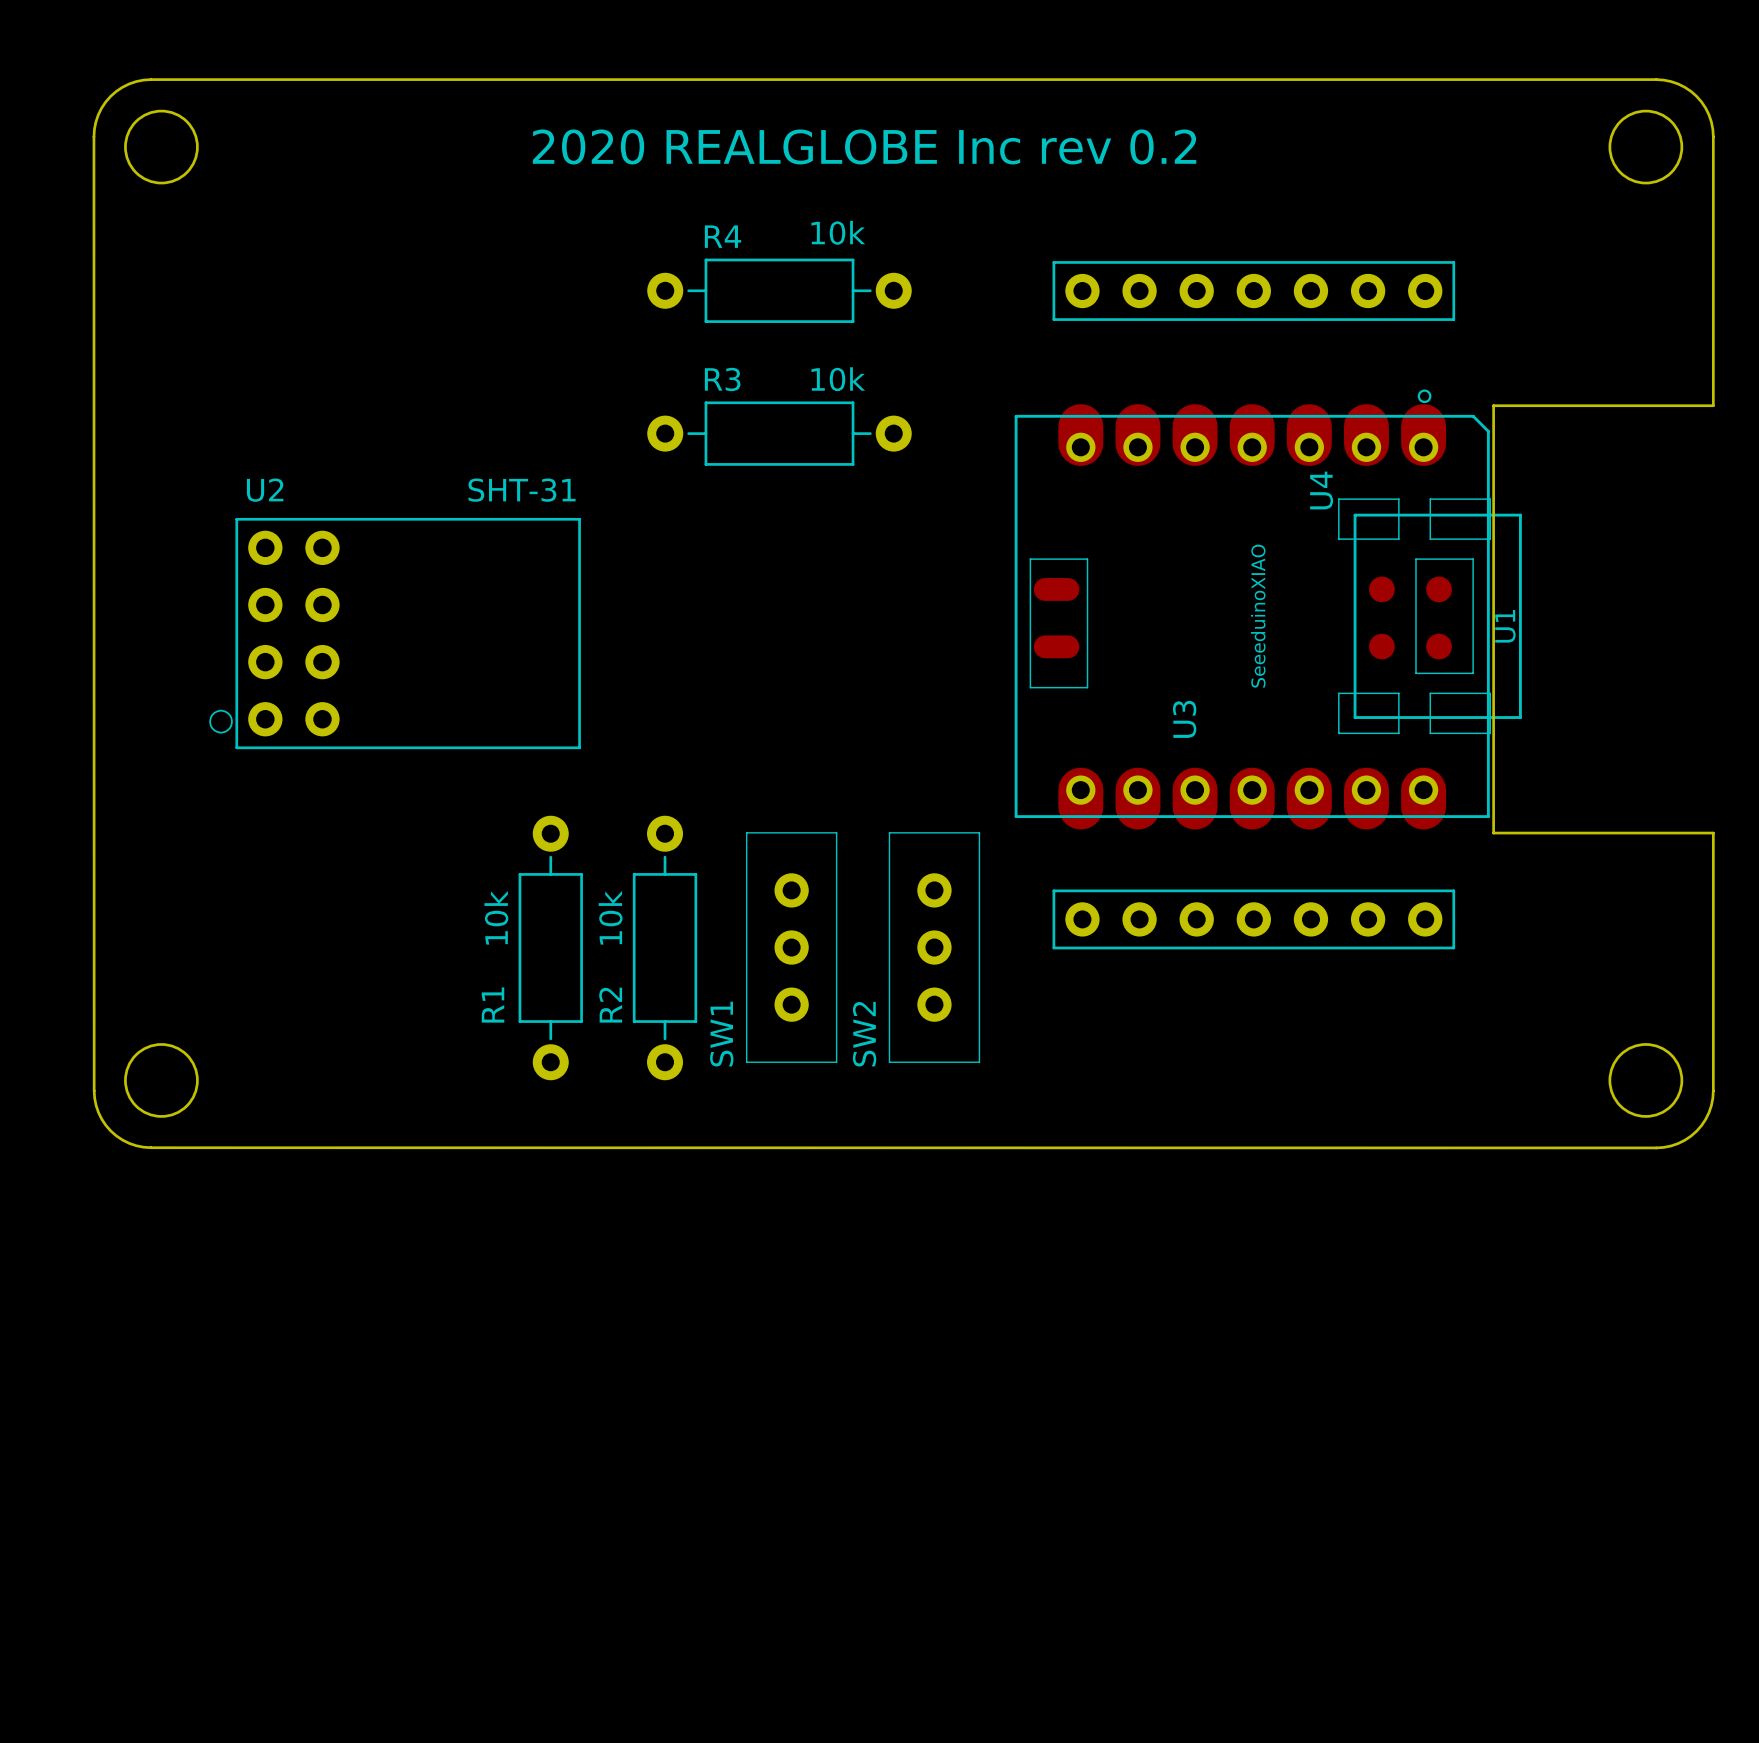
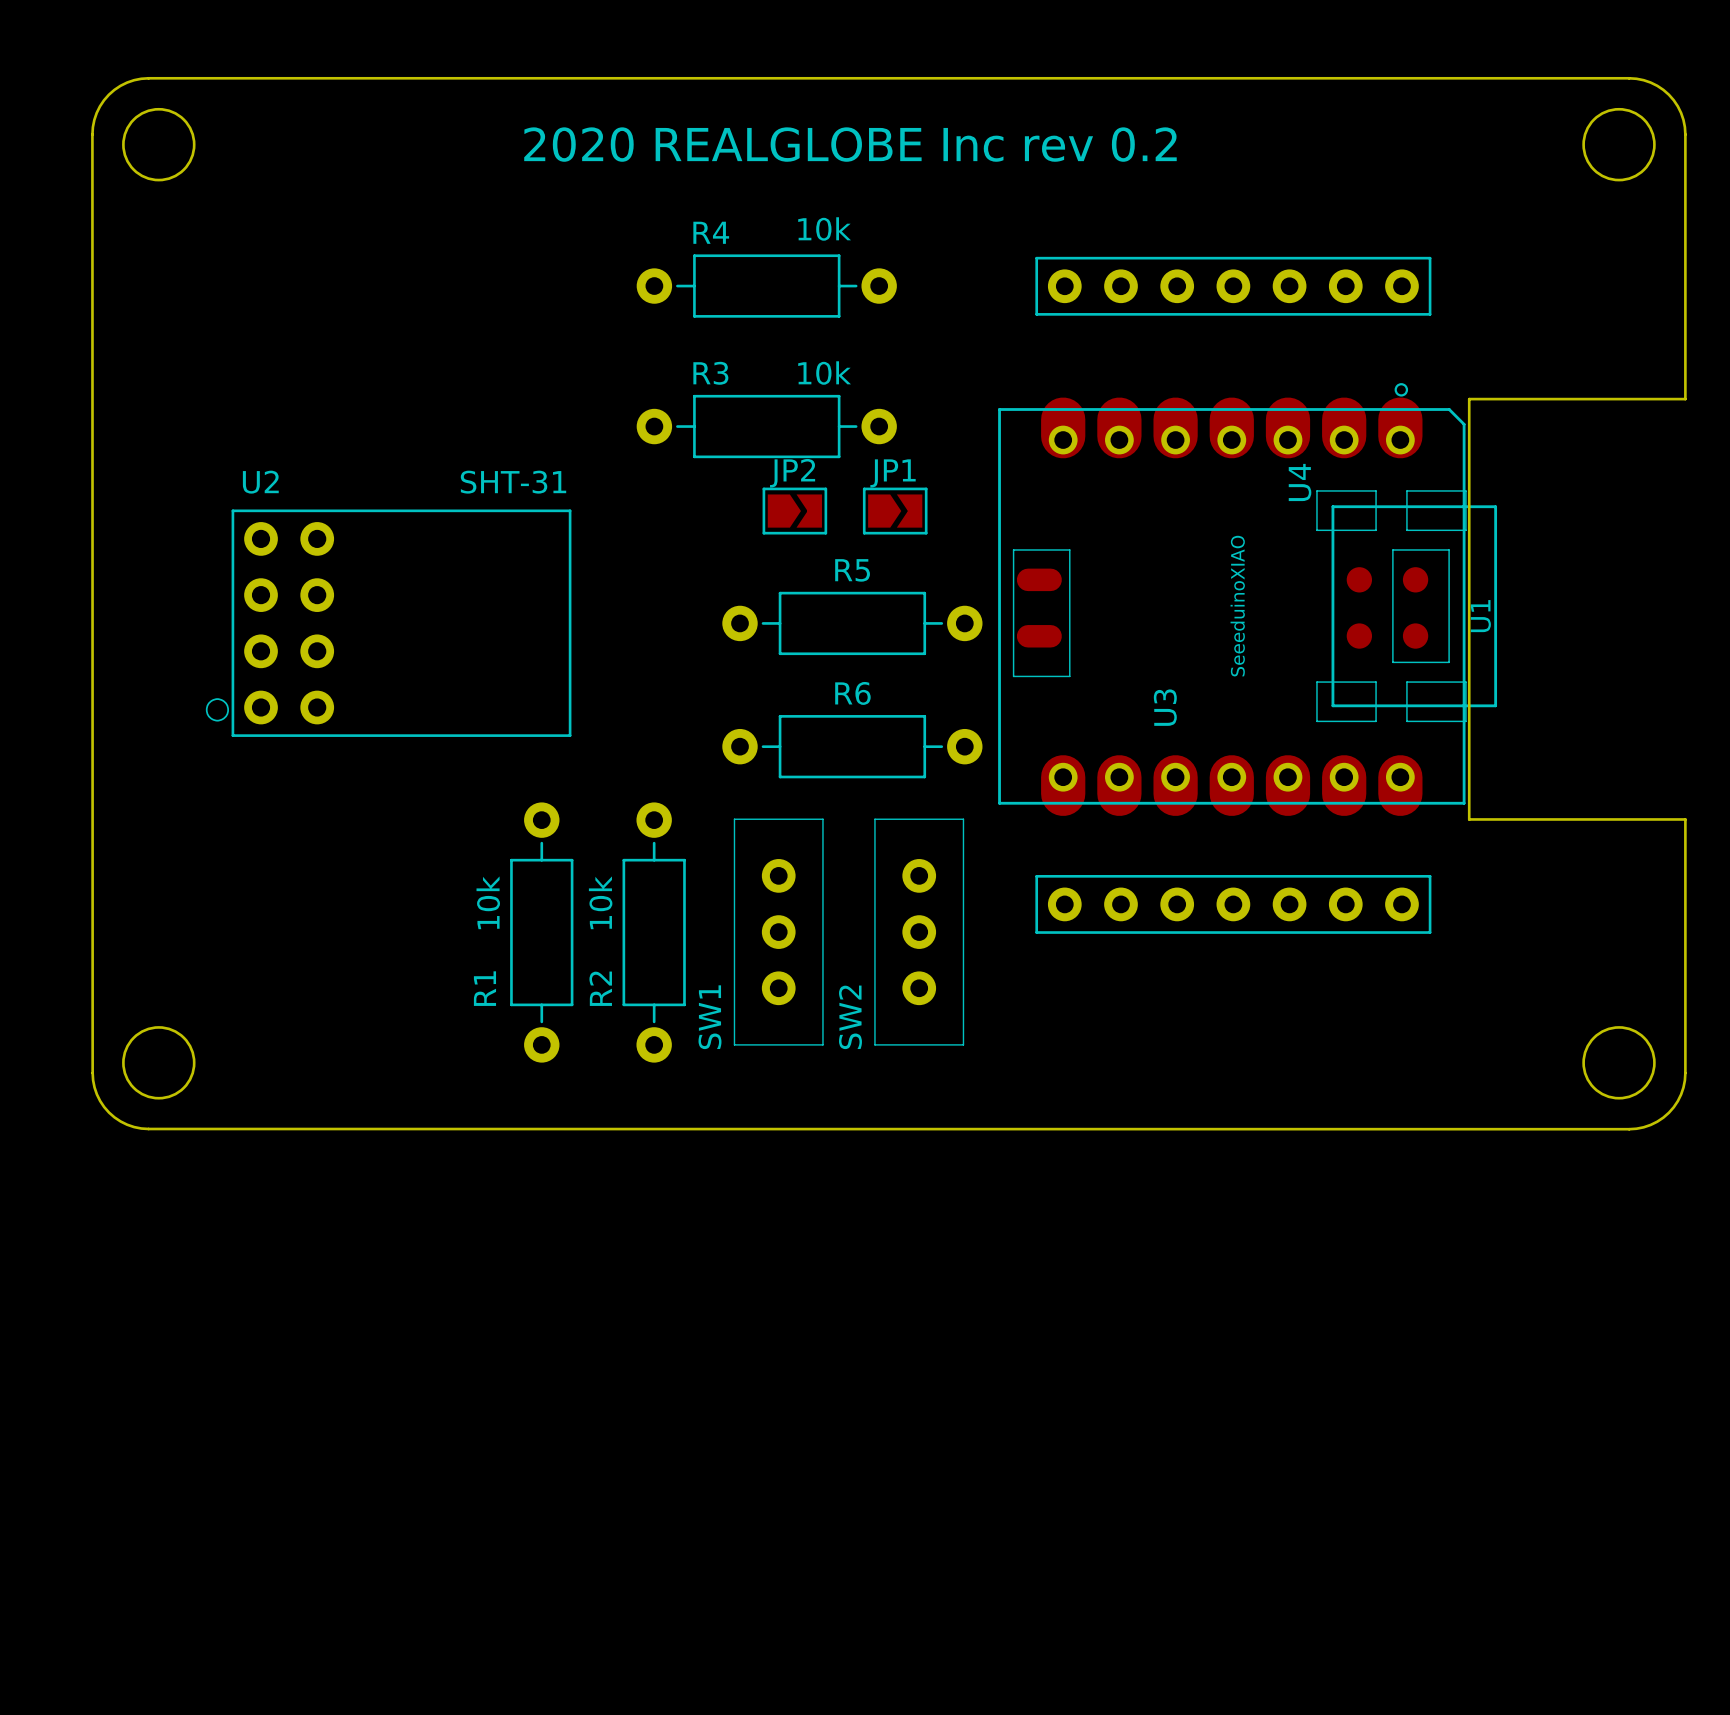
JP2: none -> (794, 511)
JP1: none -> (895, 511)
R5: none -> (852, 623)
R6: none -> (852, 746)

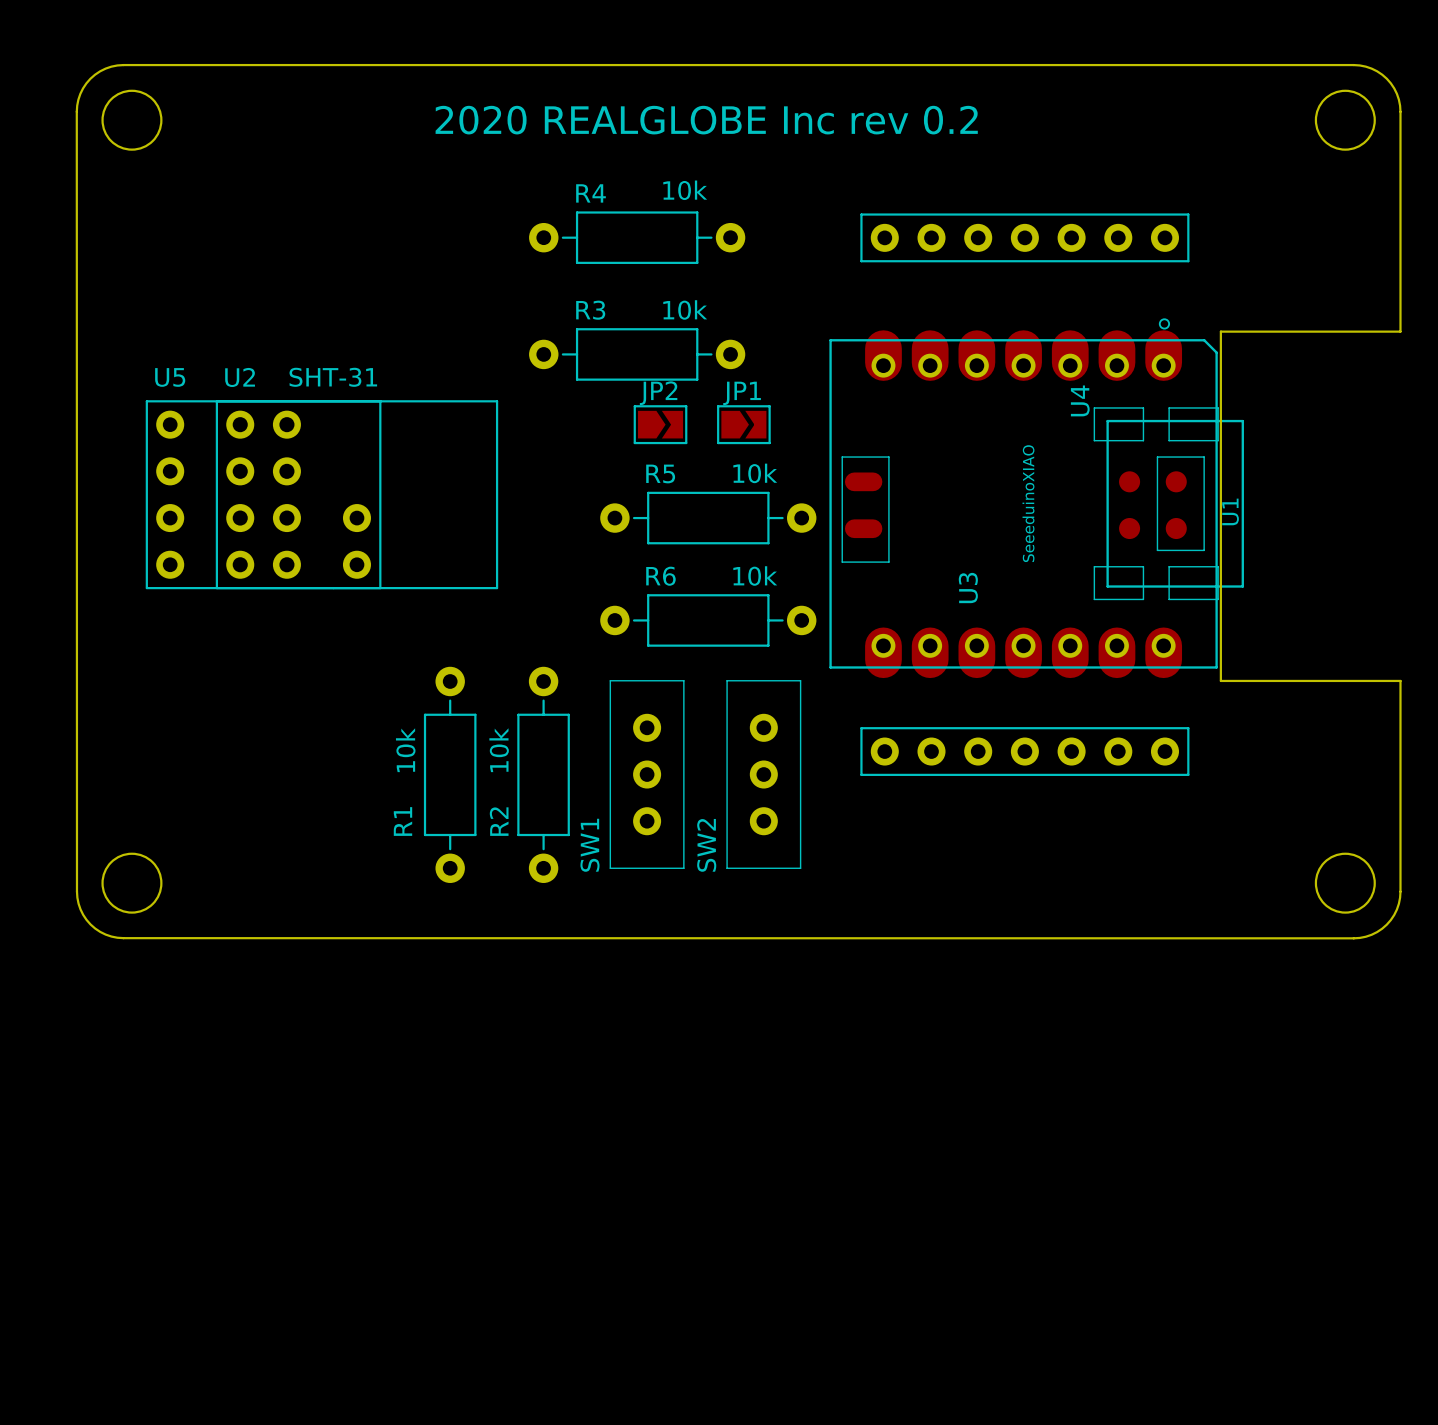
text position: SHT-31 (513, 482) -> SHT-31 (333, 377)
text: none -> 10k (755, 473)
R5 name position: R5 (852, 570) -> R5 (660, 473)
U5: none -> (263, 494)
U2 position: (401, 623) -> (356, 494)
R6 name position: R6 (852, 693) -> R6 (660, 576)
text: none -> 10k (755, 575)
U2 text: ○ (217, 709) -> none

